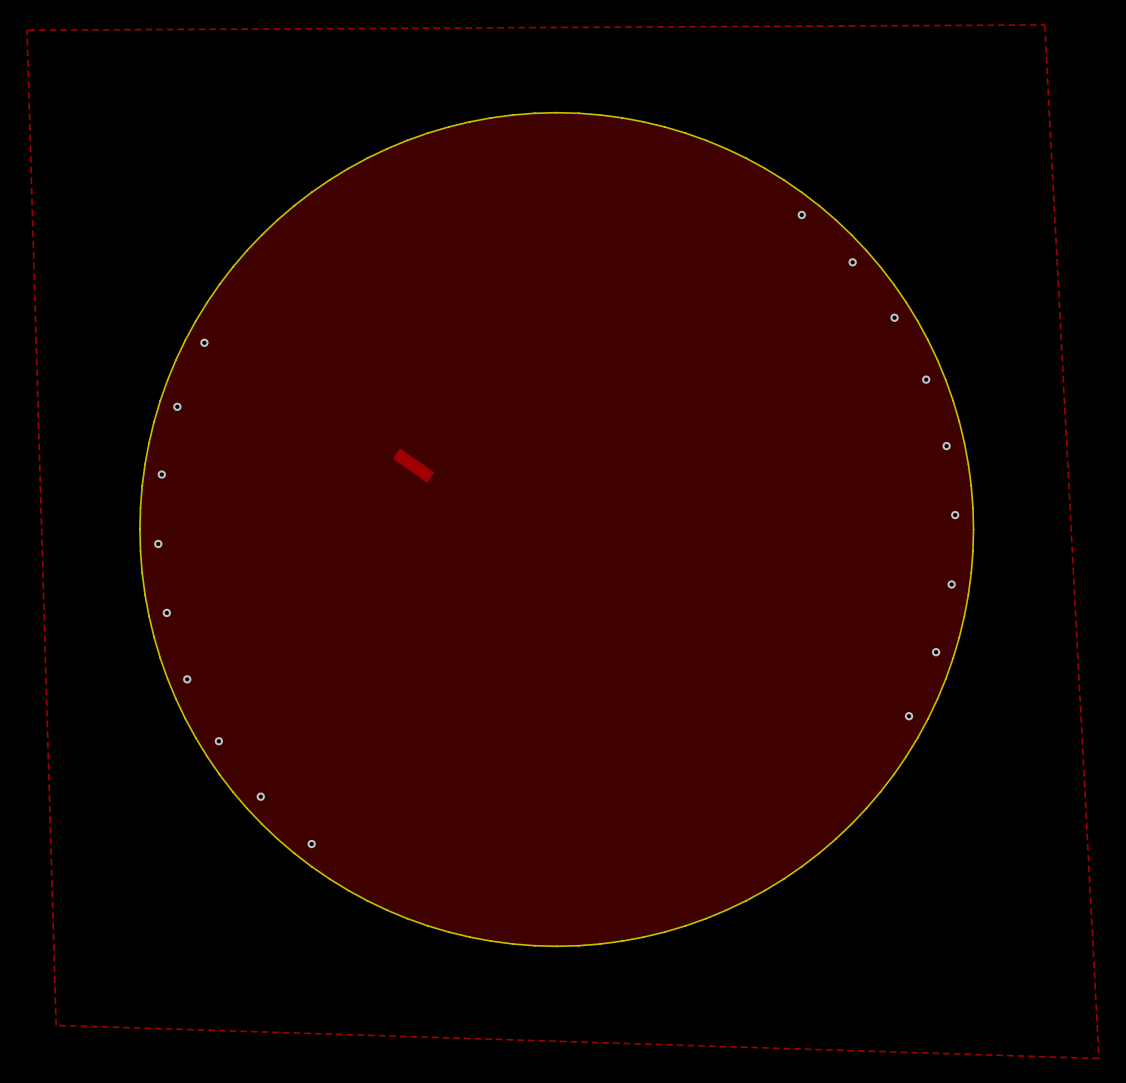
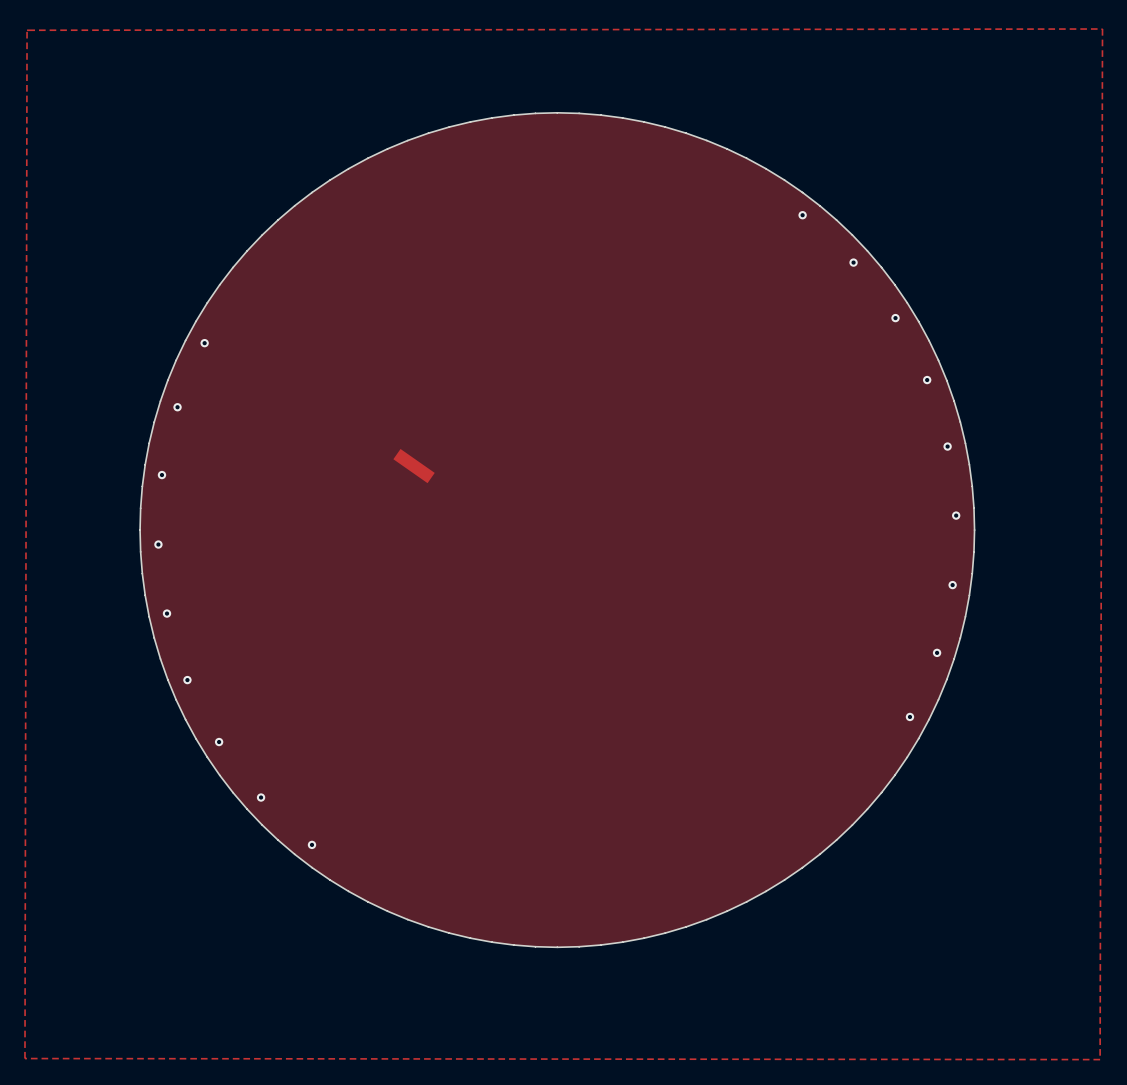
zone outline: (27, 30) (56, 1025) (1098, 1058) (1044, 24) (28, 30) -> (27, 30) (24, 1058) (1100, 1059) (1102, 29) (28, 30)

